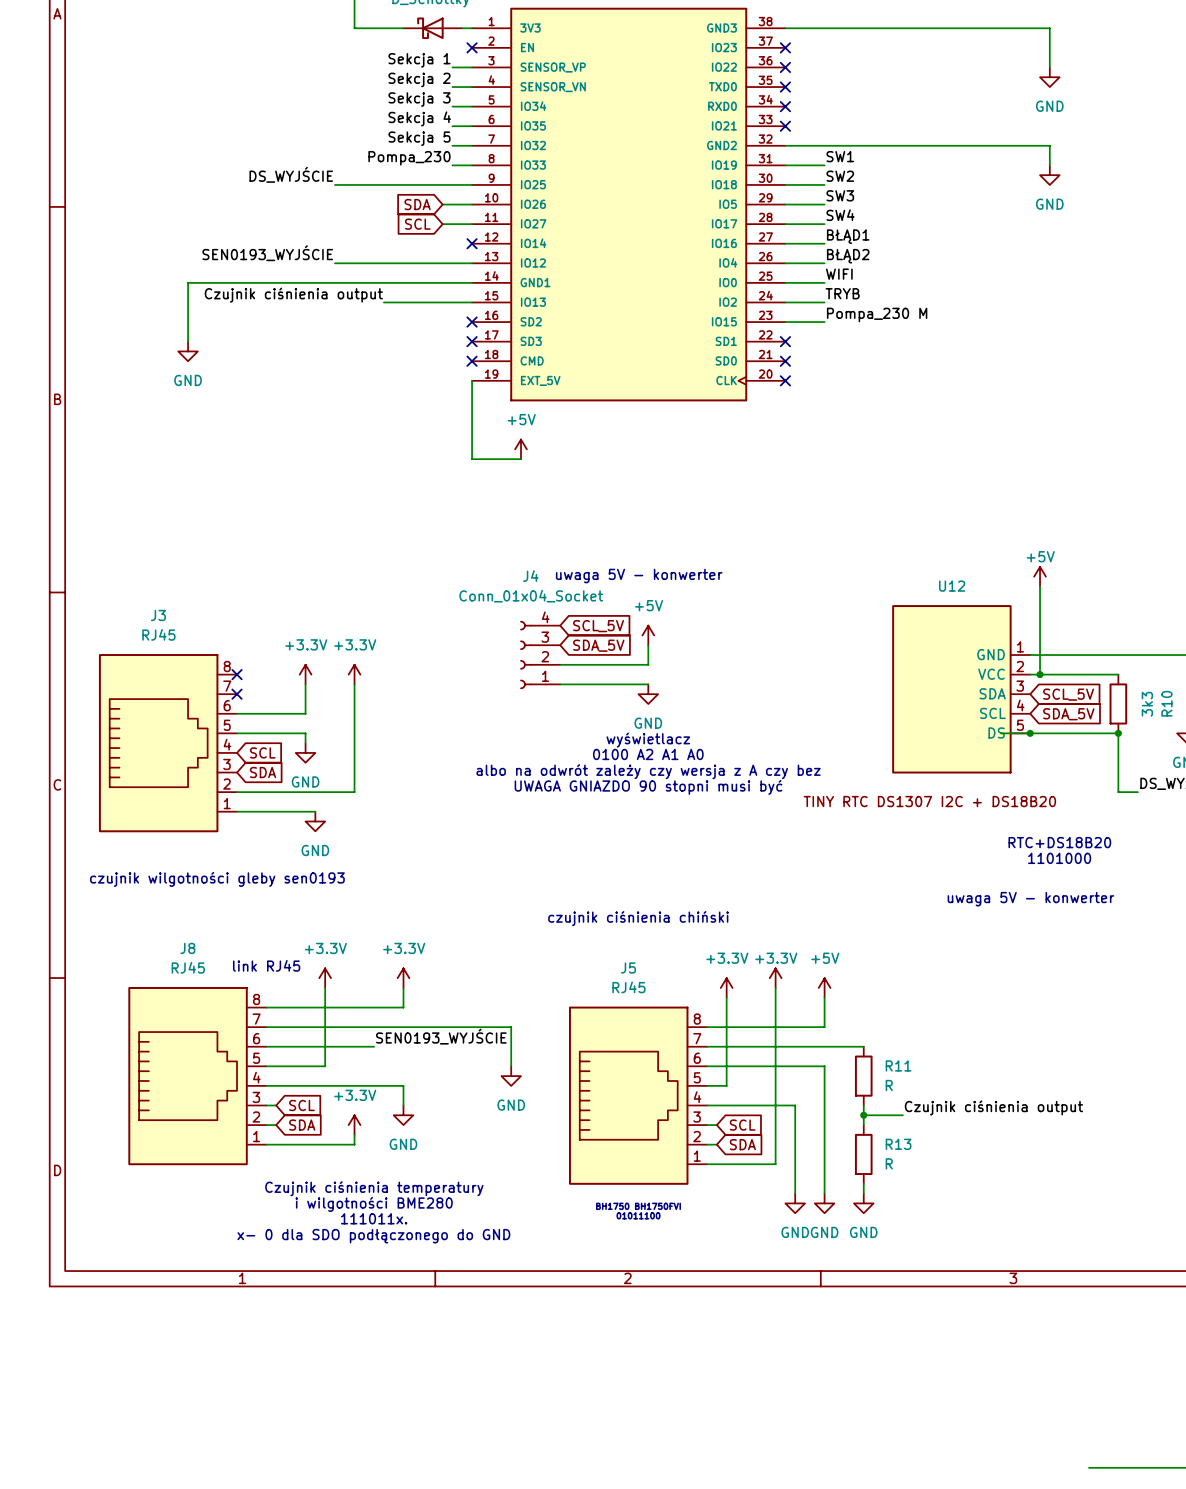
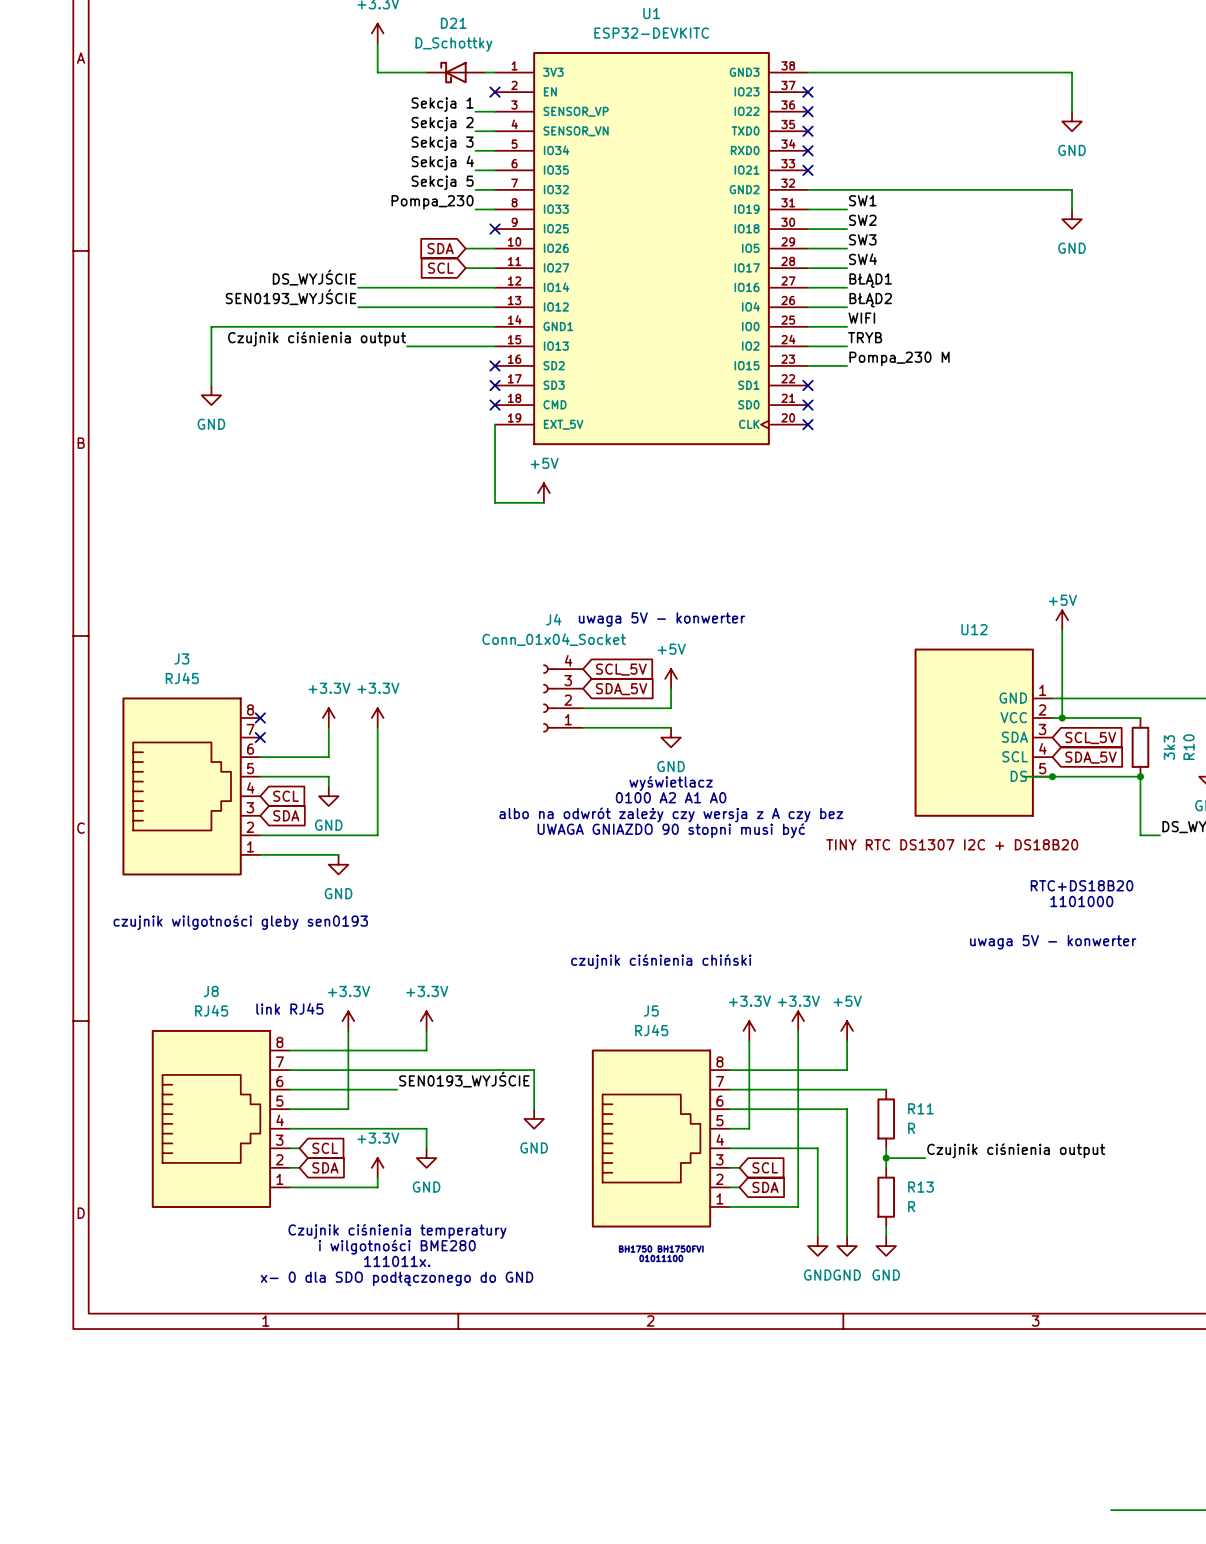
label position: DS_WYJŚCIE (291, 174) -> DS_WYJŚCIE (314, 277)
wire: (334, 184) (472, 184) -> (358, 287) (495, 287)
no-connect mark: none -> (495, 229)
no-connect mark: (472, 243) -> none

